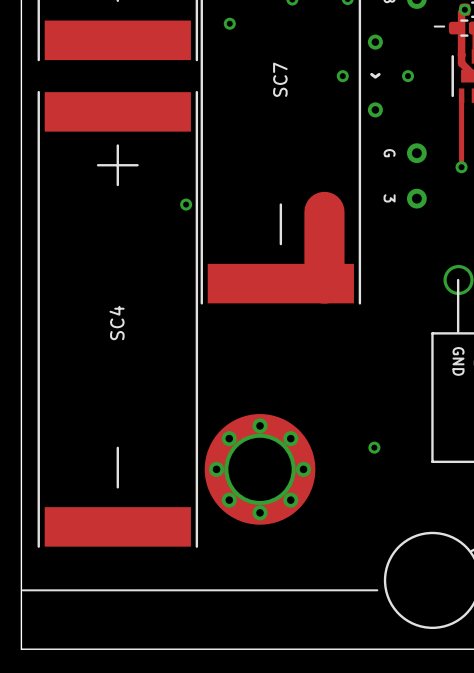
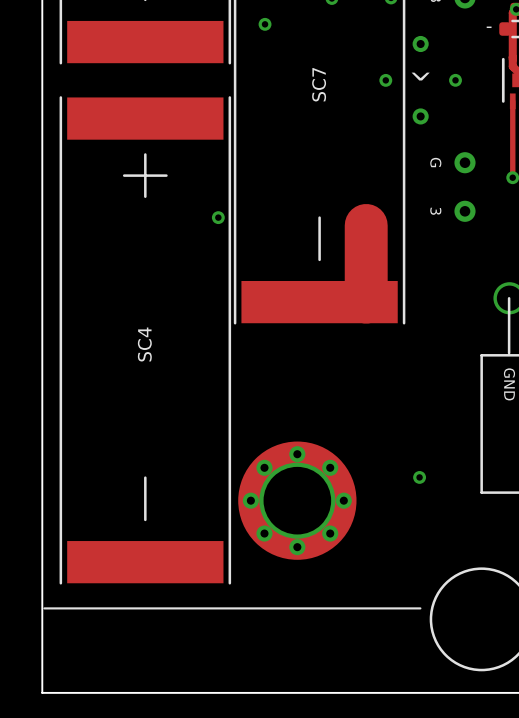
line: none -> (44, 608) (420, 608)
line: (22, 590) (377, 590) -> none

